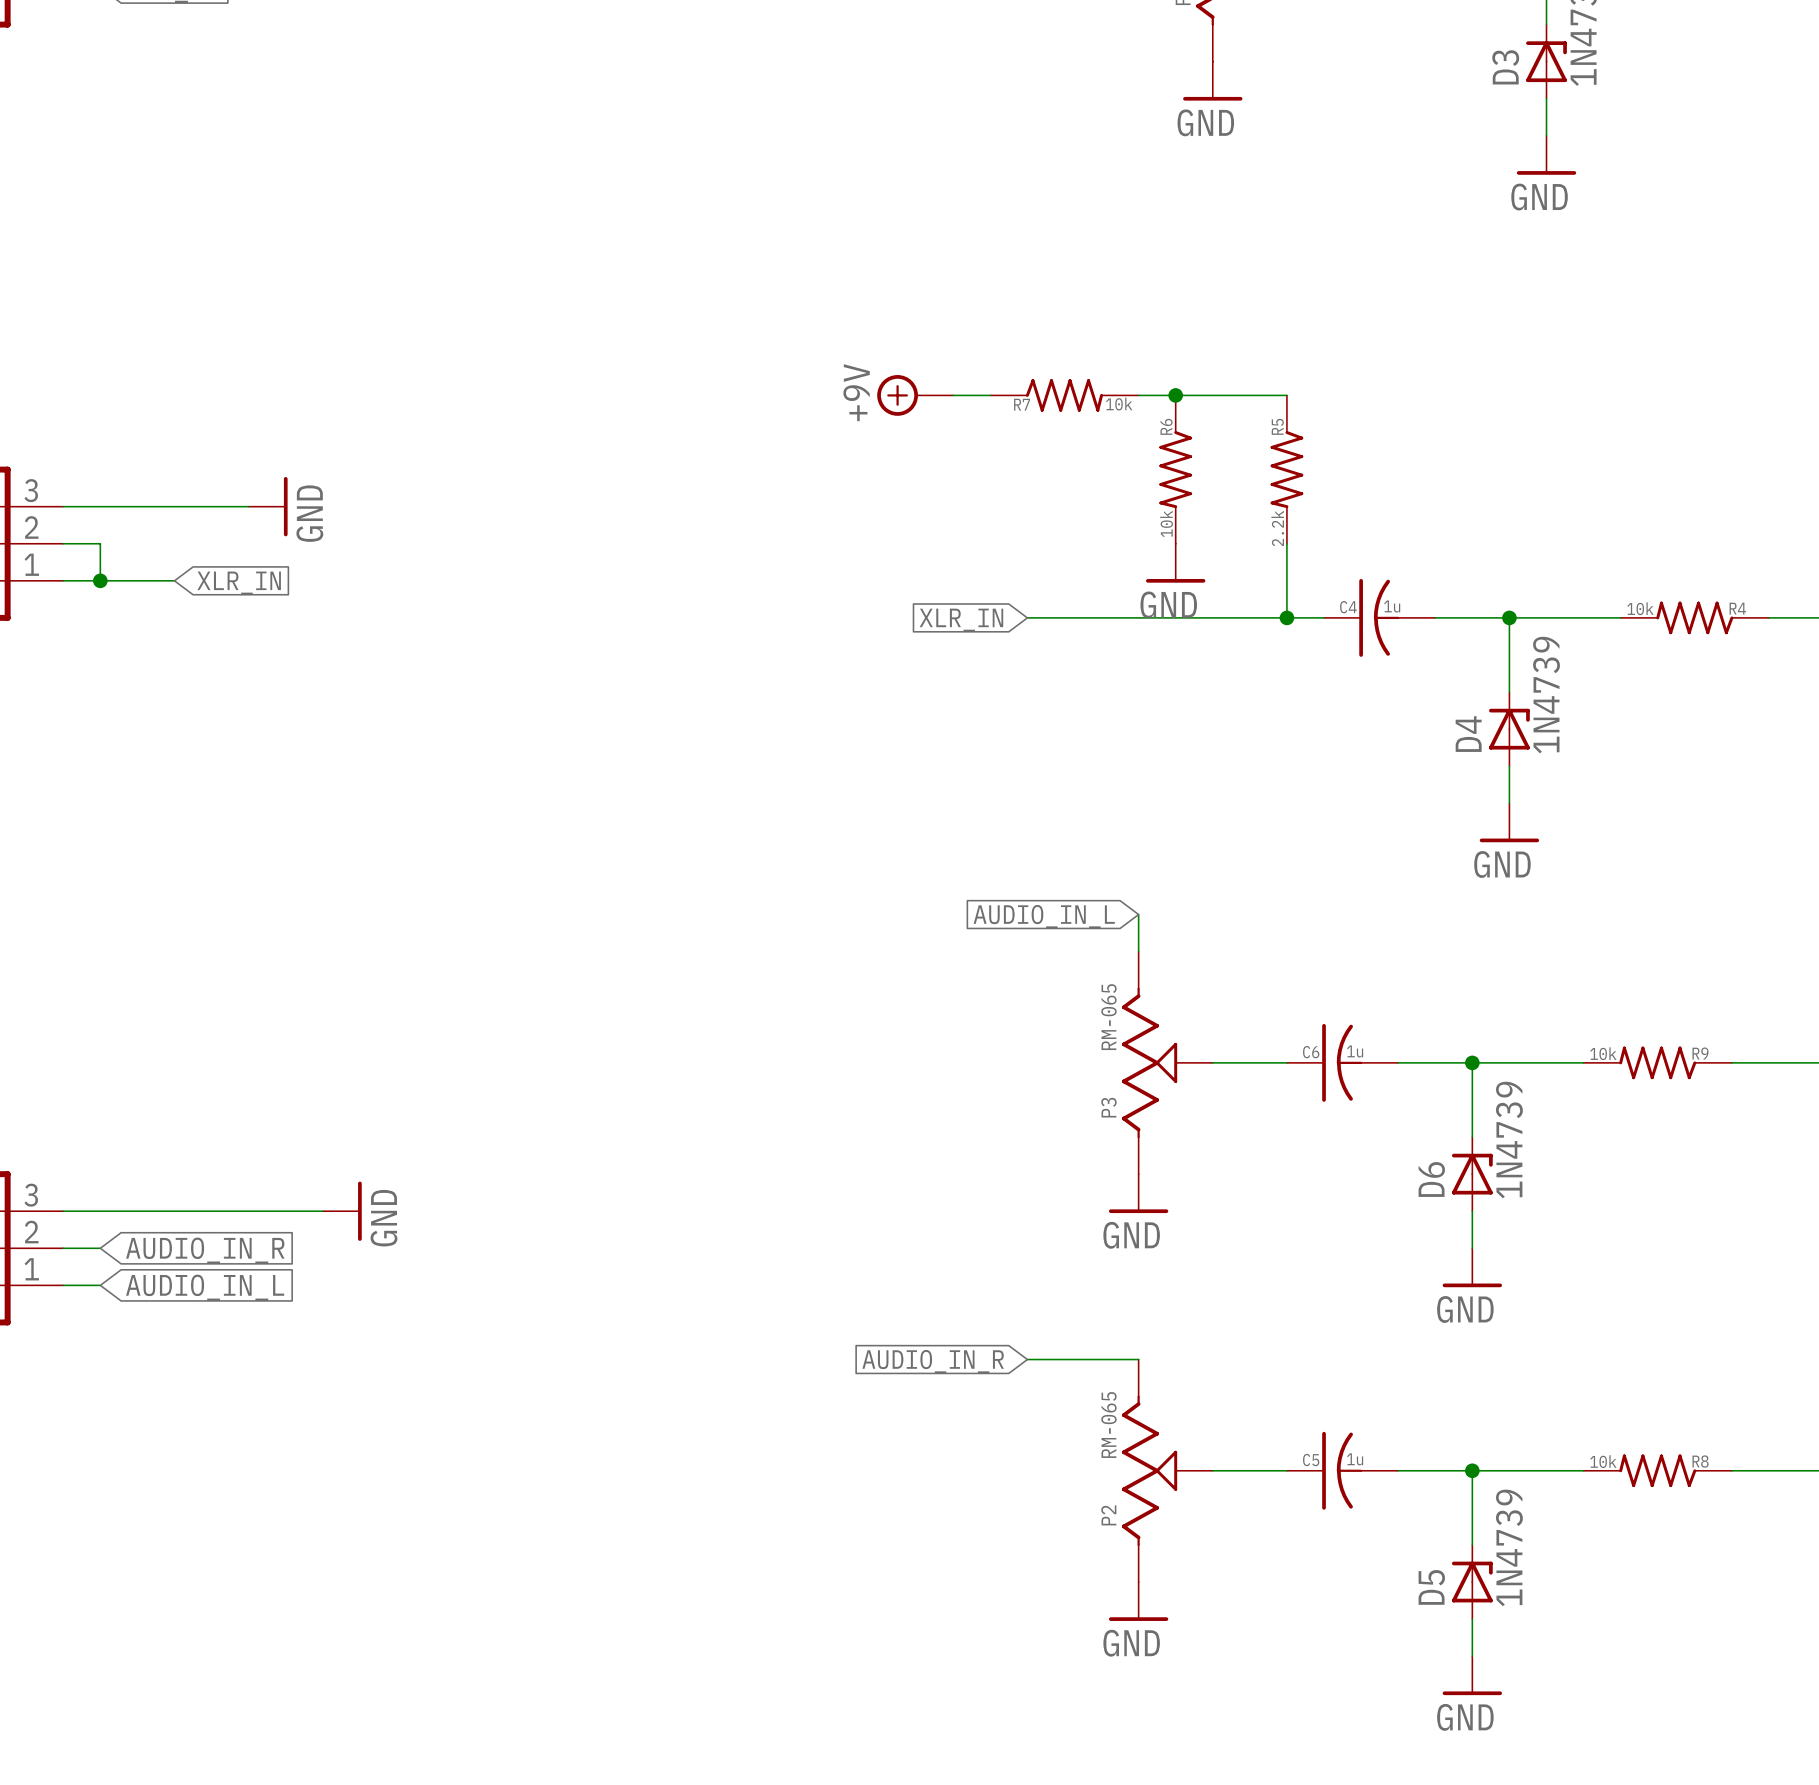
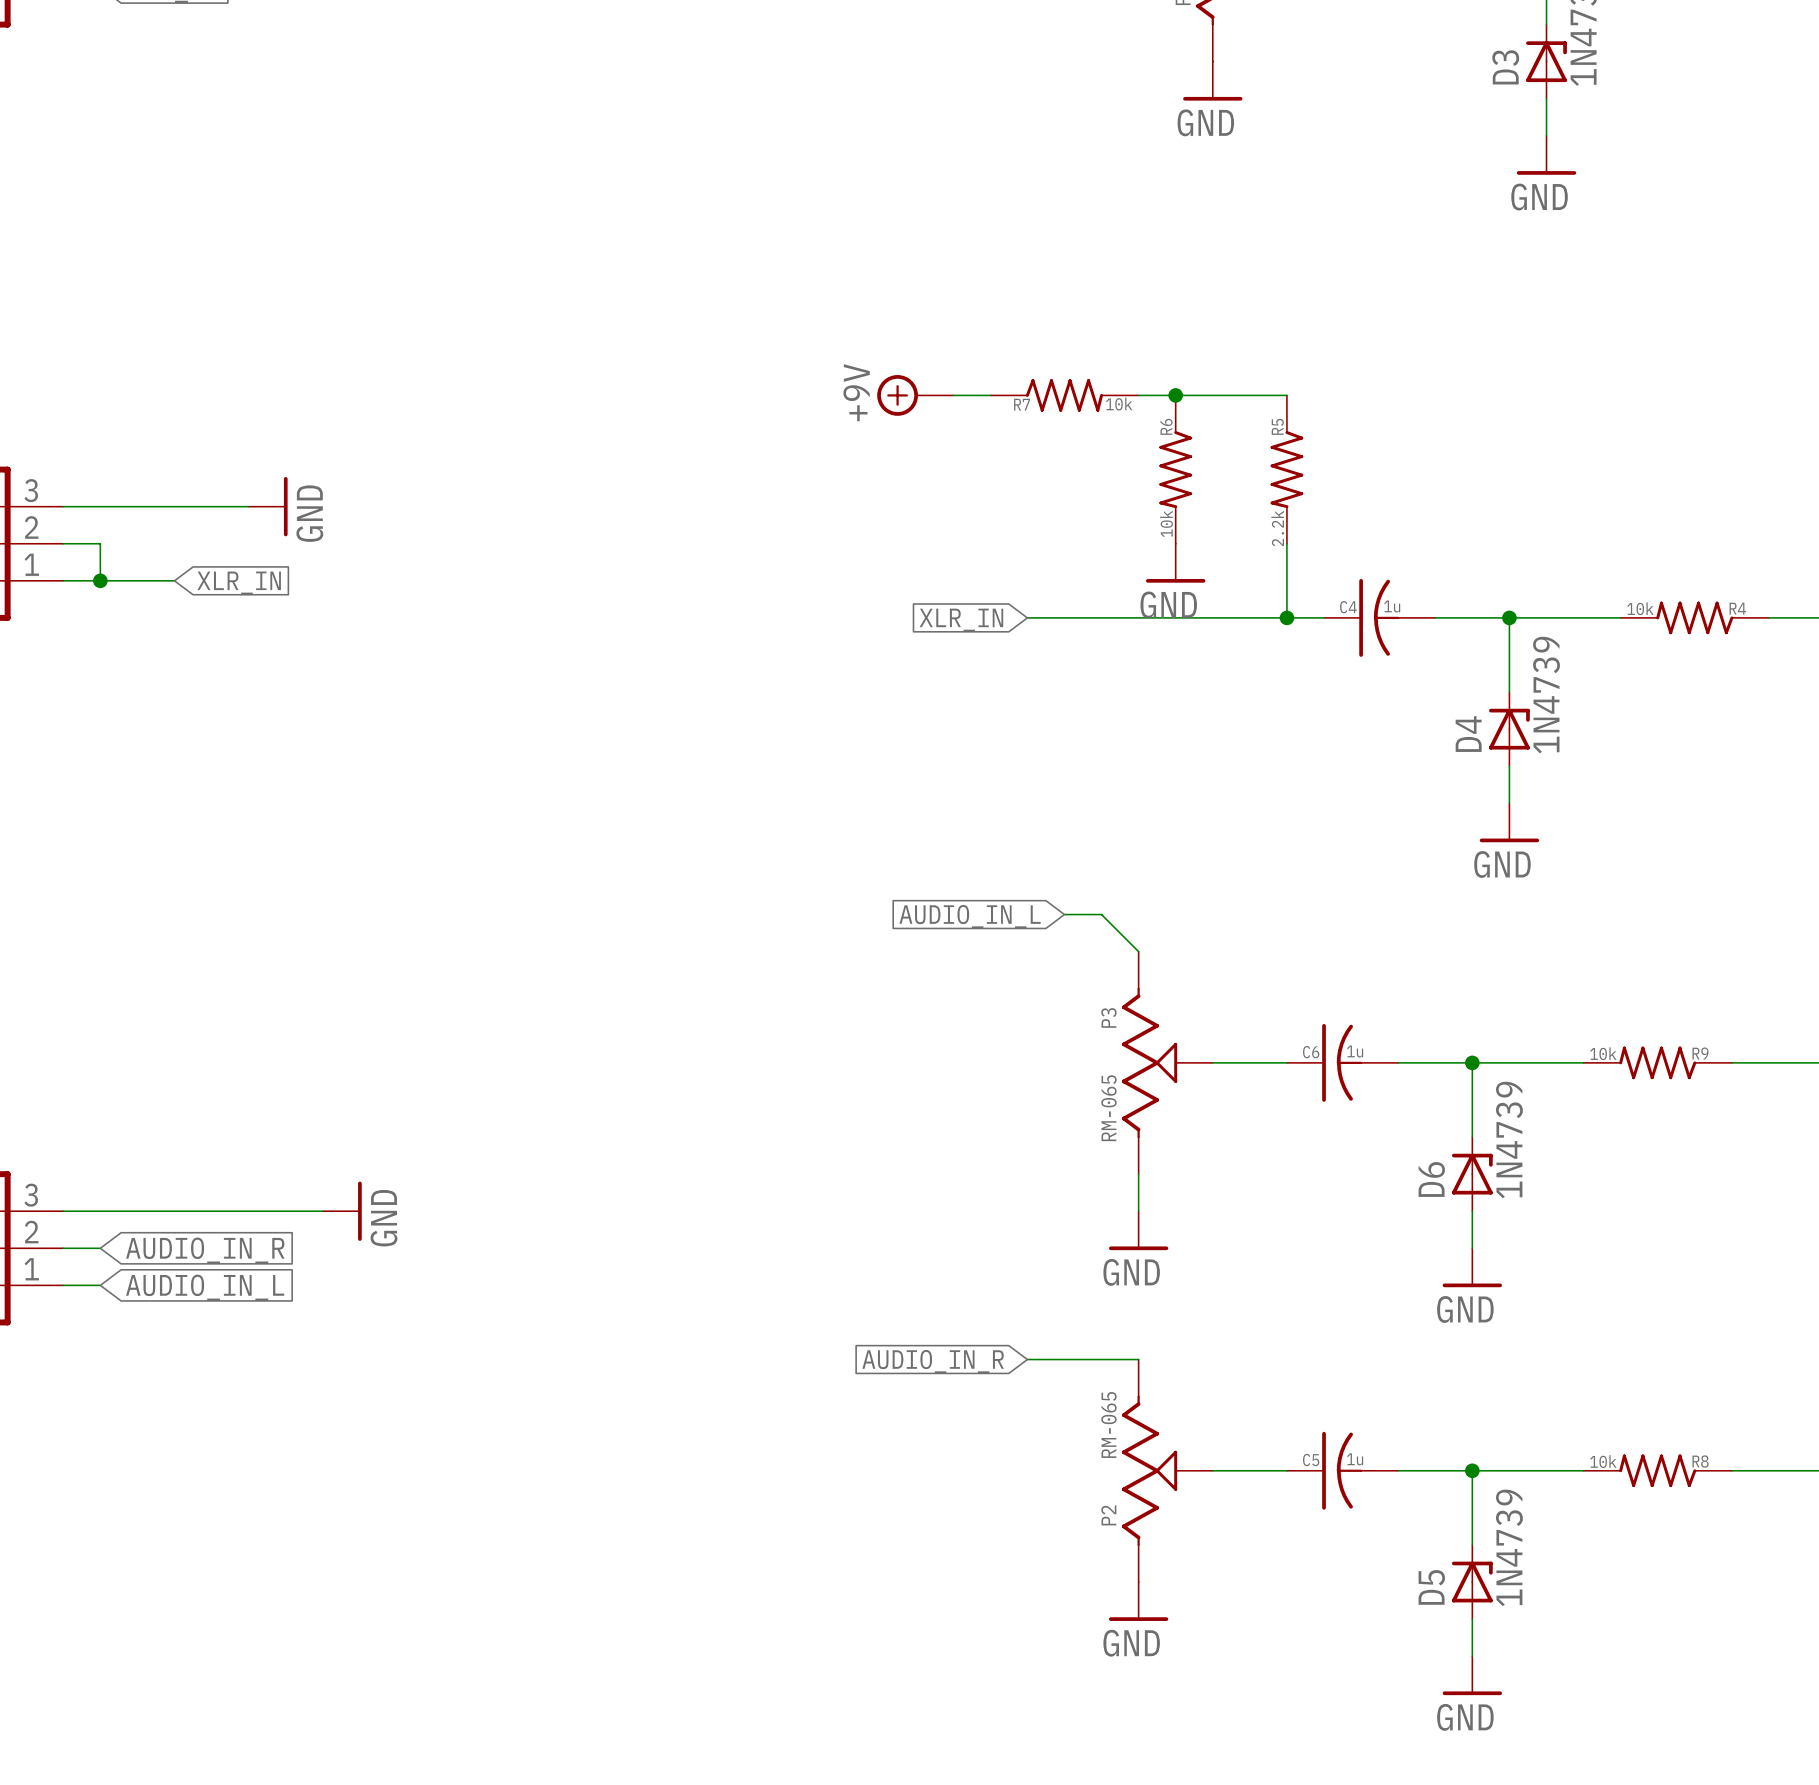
wire: (1138, 914) (1138, 951) -> (1064, 914) (1101, 914) (1138, 951)
global label position: AUDIO_IN_L (1044, 916) -> AUDIO_IN_L (970, 916)
P3 value position: RM-065 (1108, 1017) -> RM-065 (1108, 1108)
P3 name position: P3 (1108, 1107) -> P3 (1108, 1017)
power symbol position: GND (1138, 1193) -> GND (1138, 1230)

